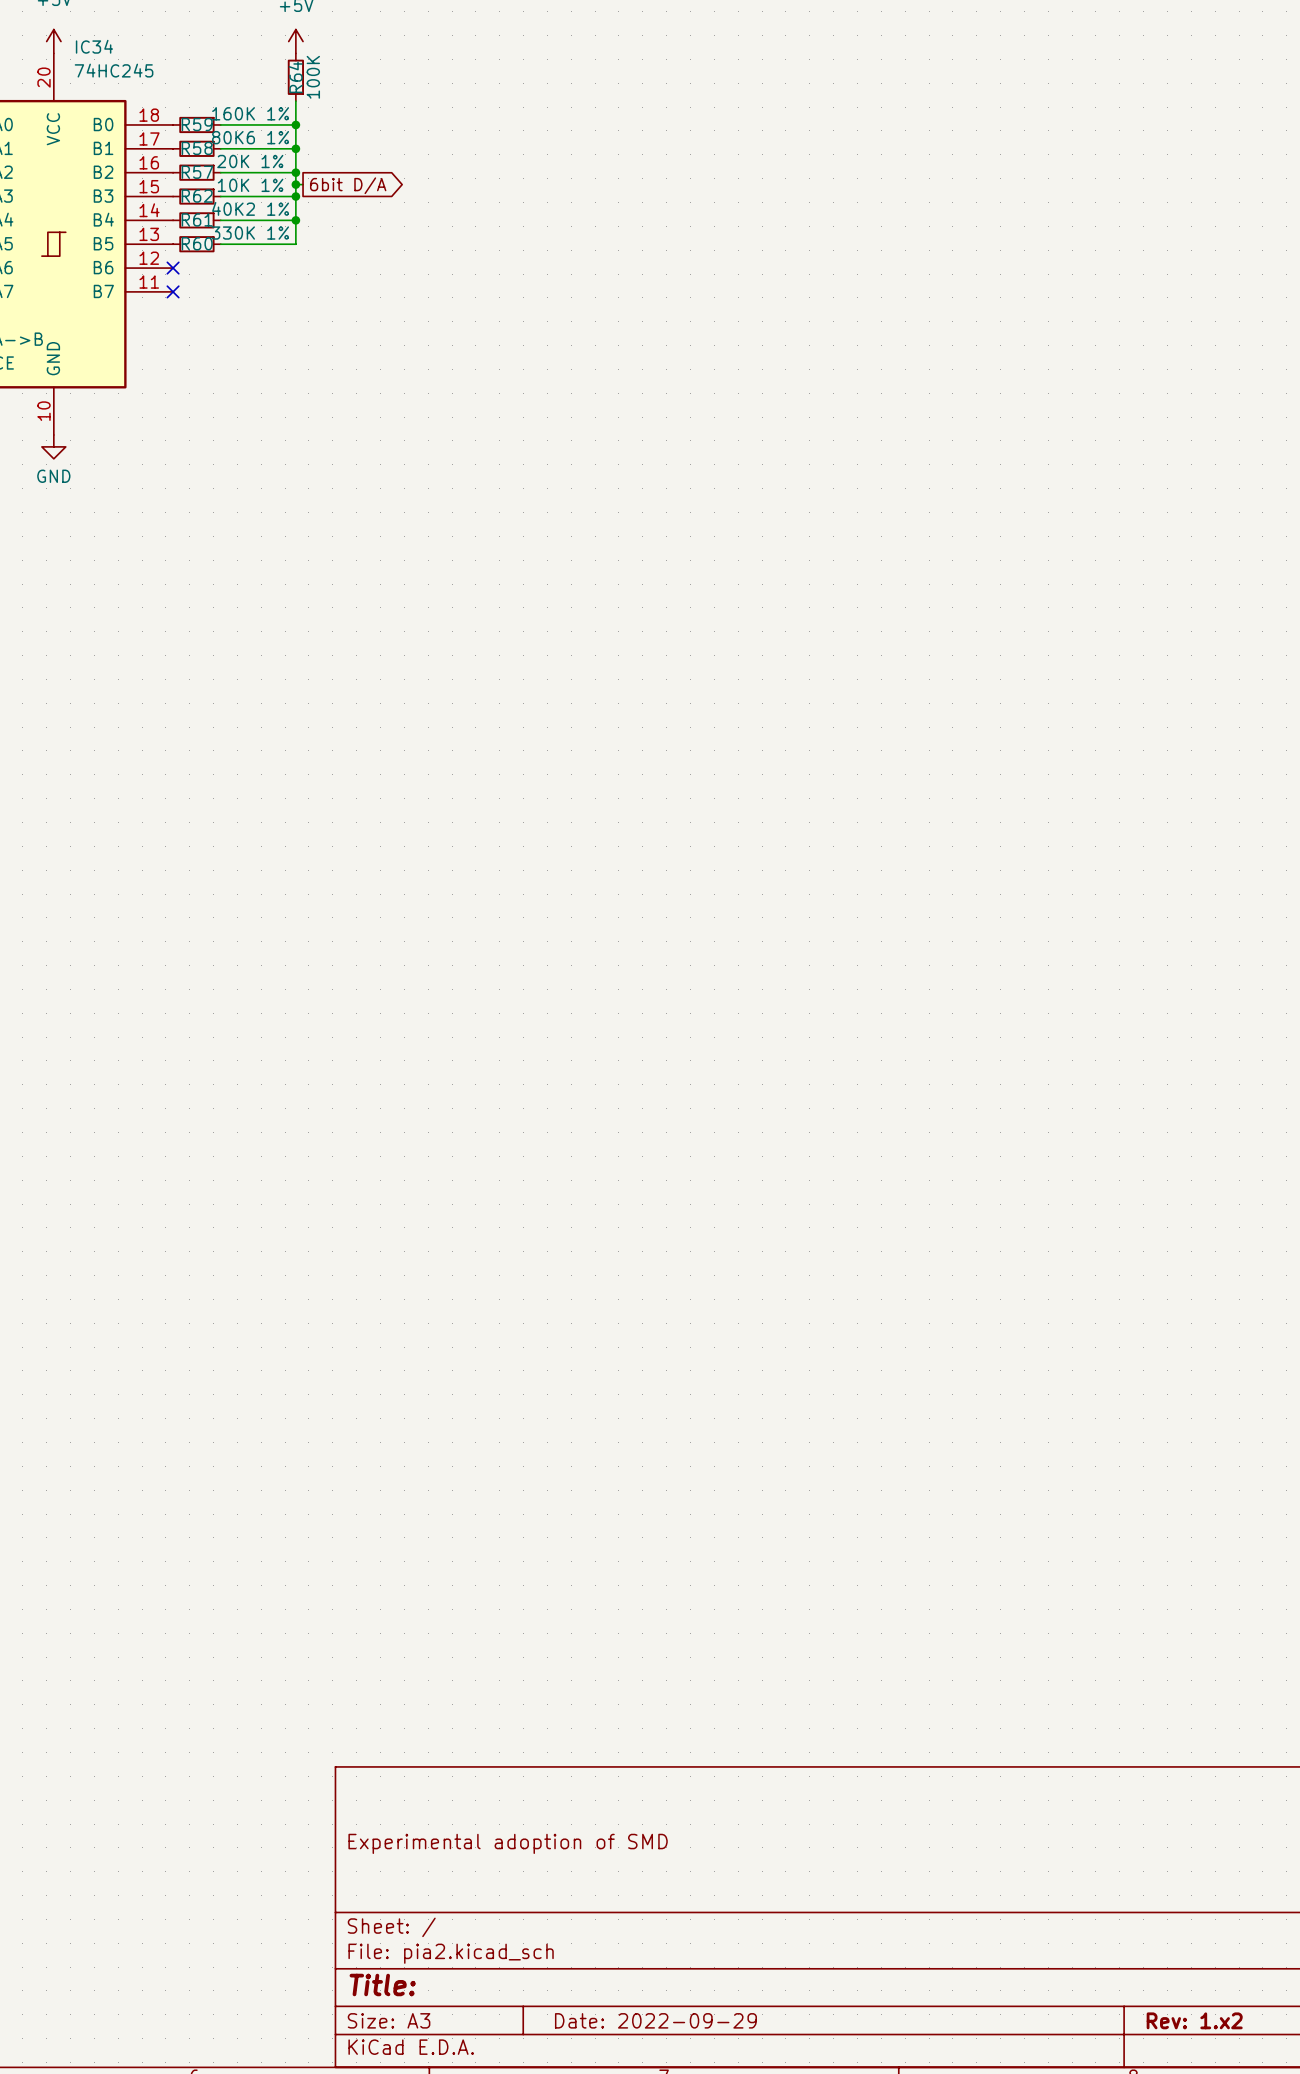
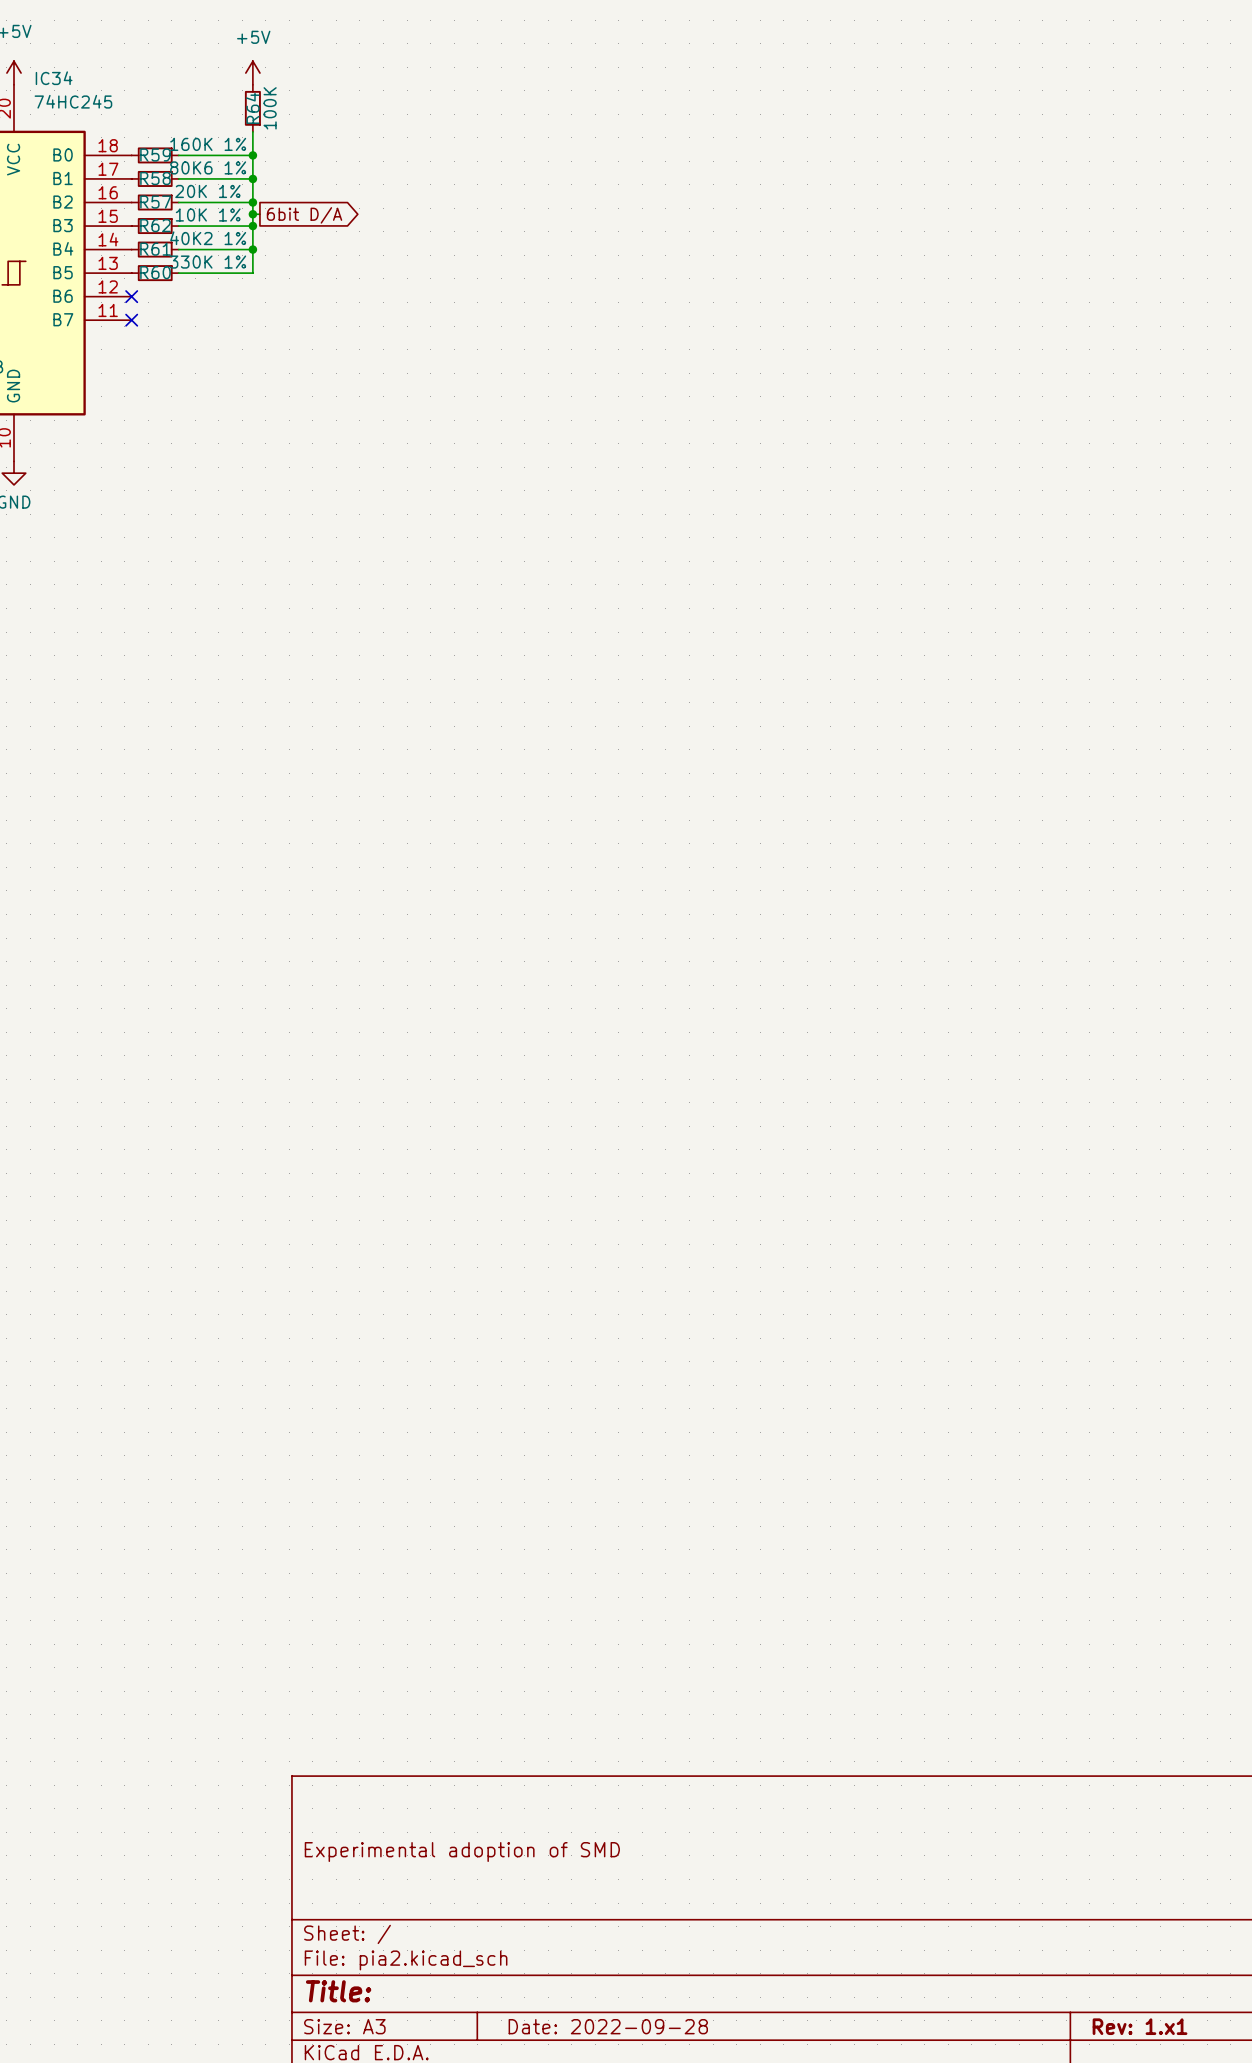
title block: Date: 2022-09-29 (655, 2020) -> Date: 2022-09-28 (608, 2026)
title block: Rev: 1.x2 (1194, 2020) -> Rev: 1.x1 (1140, 2026)

